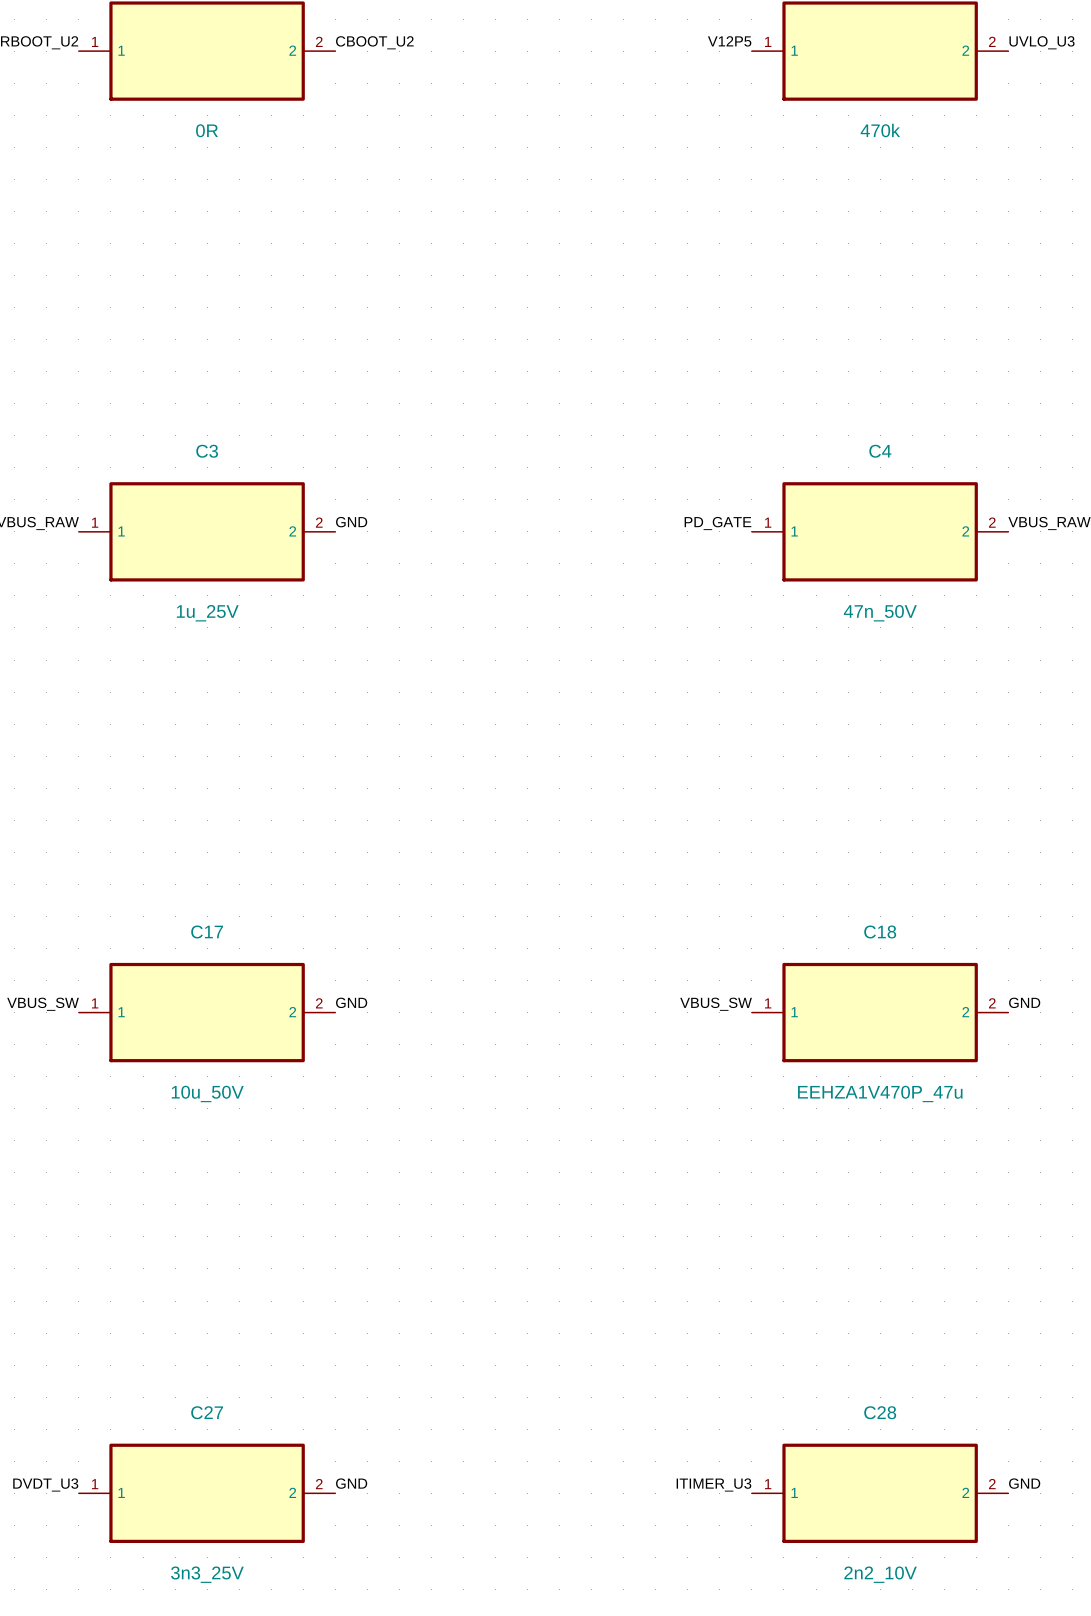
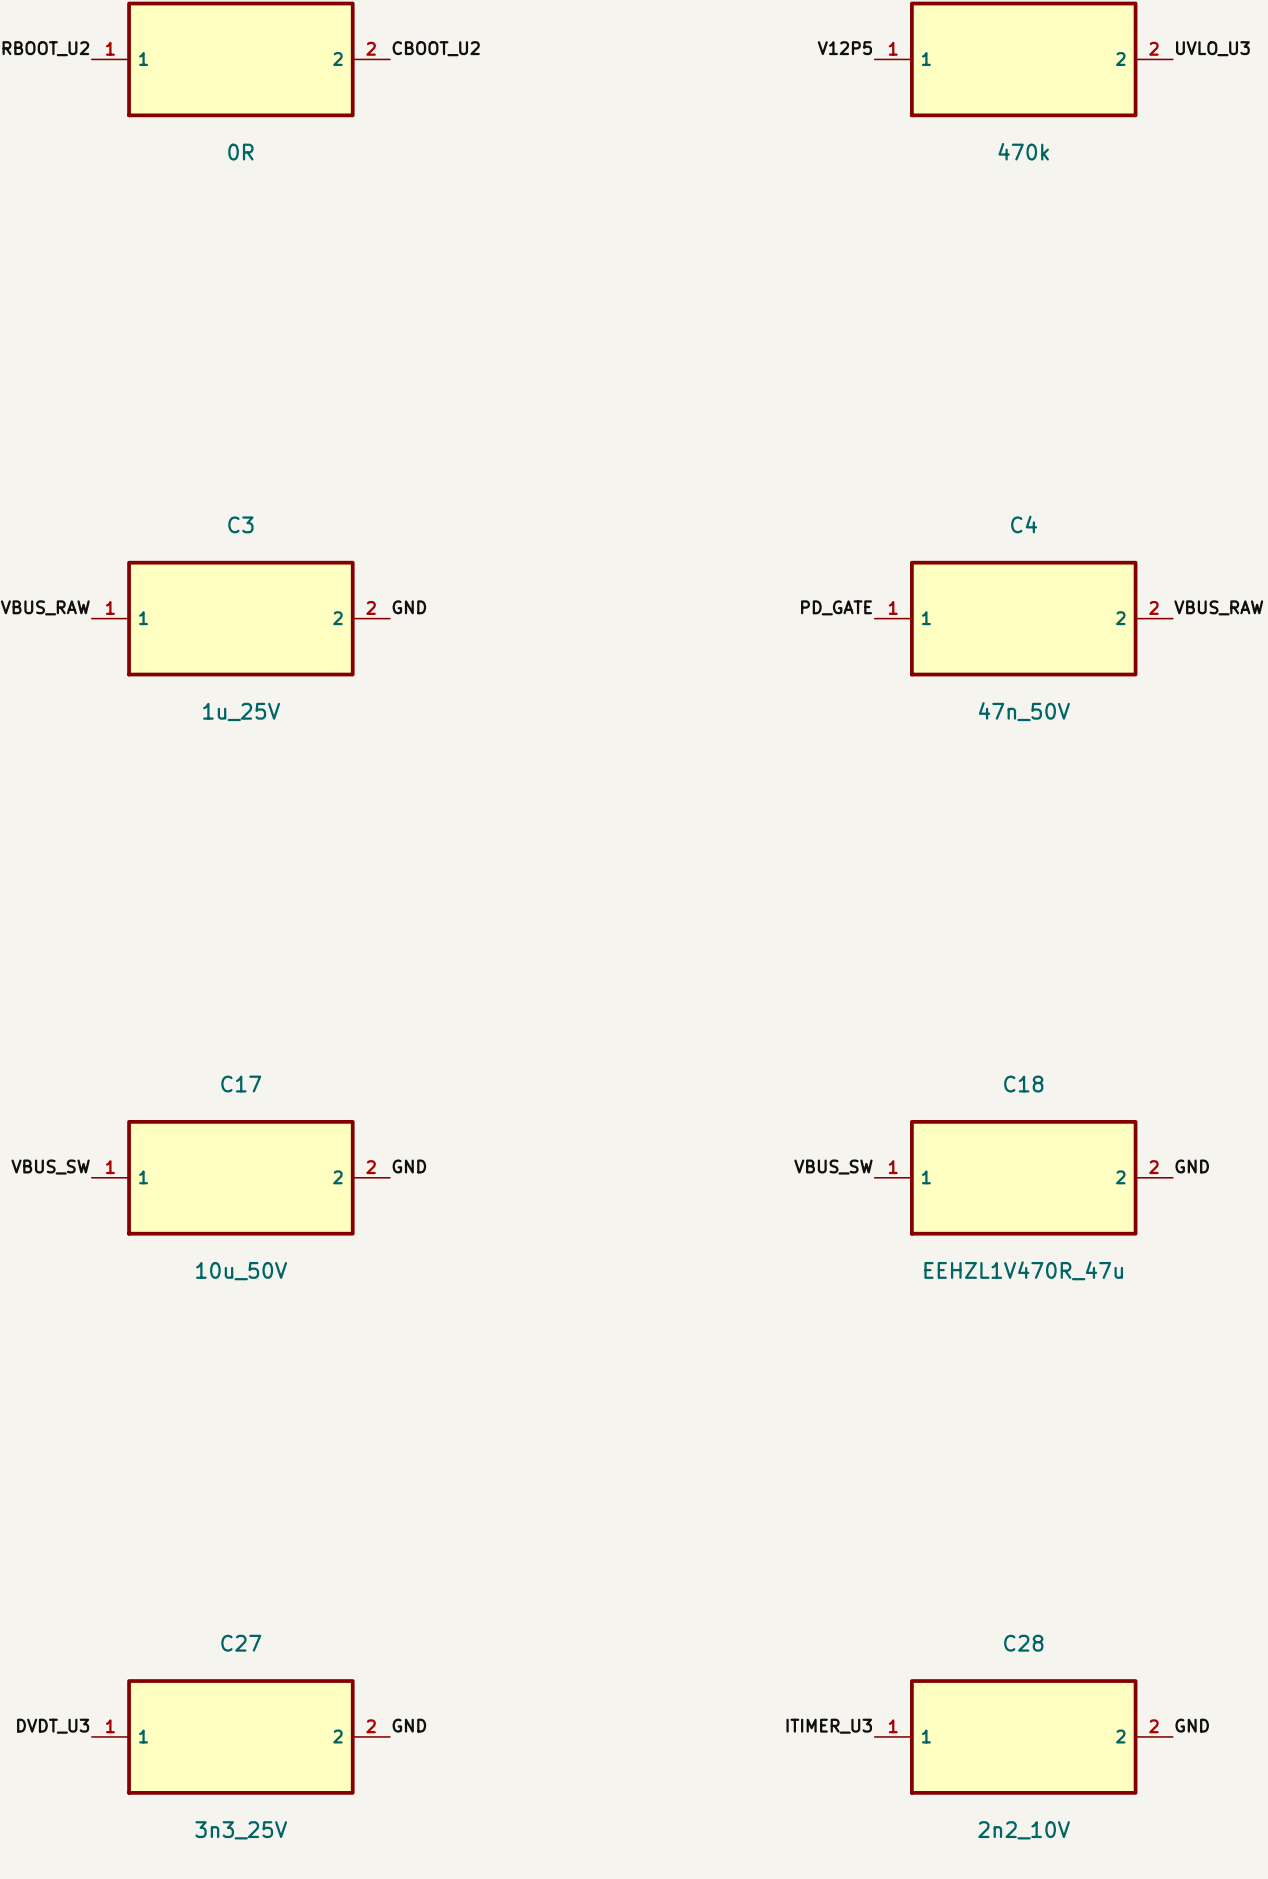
C18 value: EEHZA1V470P_47u (880, 1093) -> EEHZL1V470R_47u (1023, 1270)

